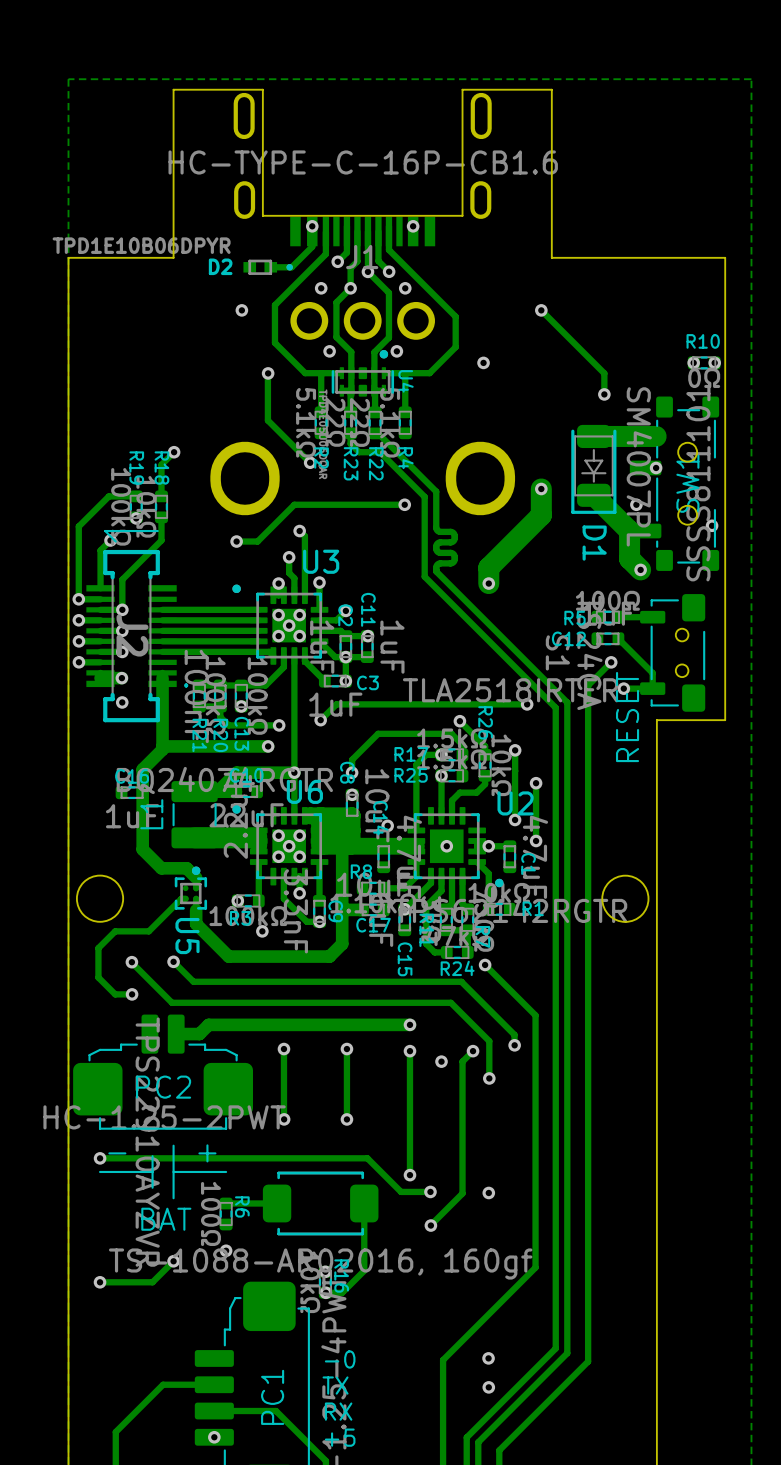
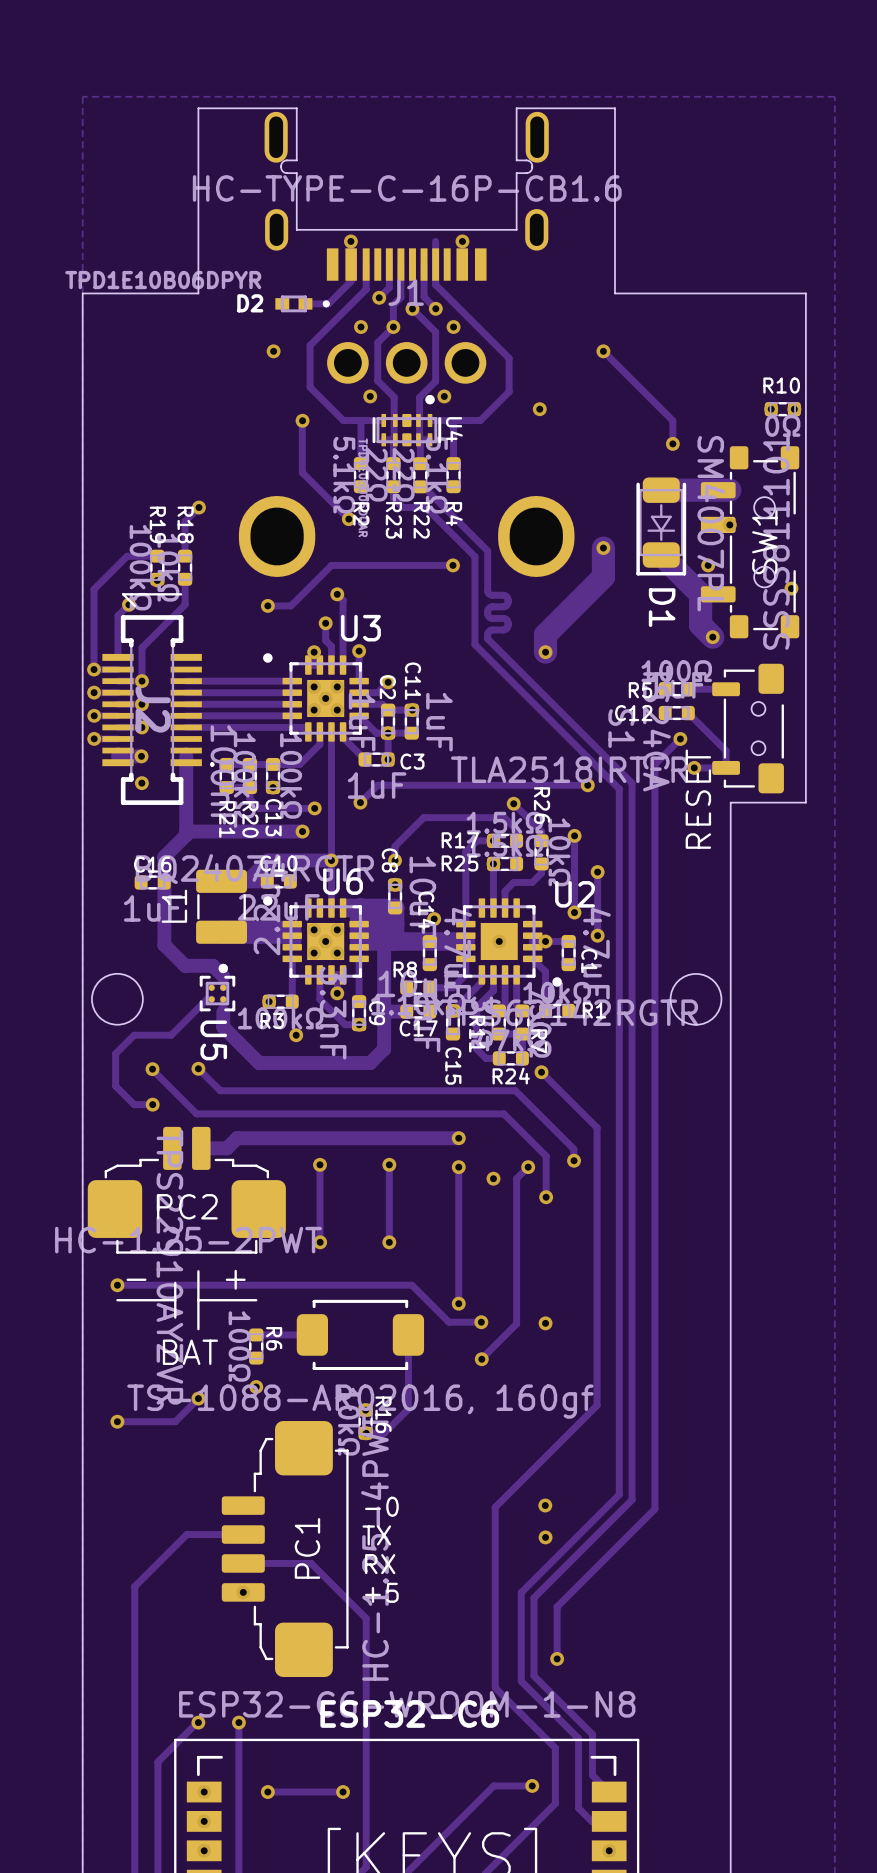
board edge: (262, 137) (262, 148) -> (296, 160) (285, 160) (281, 166) (284, 172) (296, 173)
board edge: (462, 137) (462, 148) -> (516, 160) (528, 160) (532, 166) (528, 172) (516, 173)
board edge: (462, 200) (462, 215) (262, 215) (262, 200) -> (516, 229) (296, 229)
track: none -> (435, 241) (435, 258)
via position: (312, 226) -> (350, 241)
via position: (413, 226) -> (462, 241)

